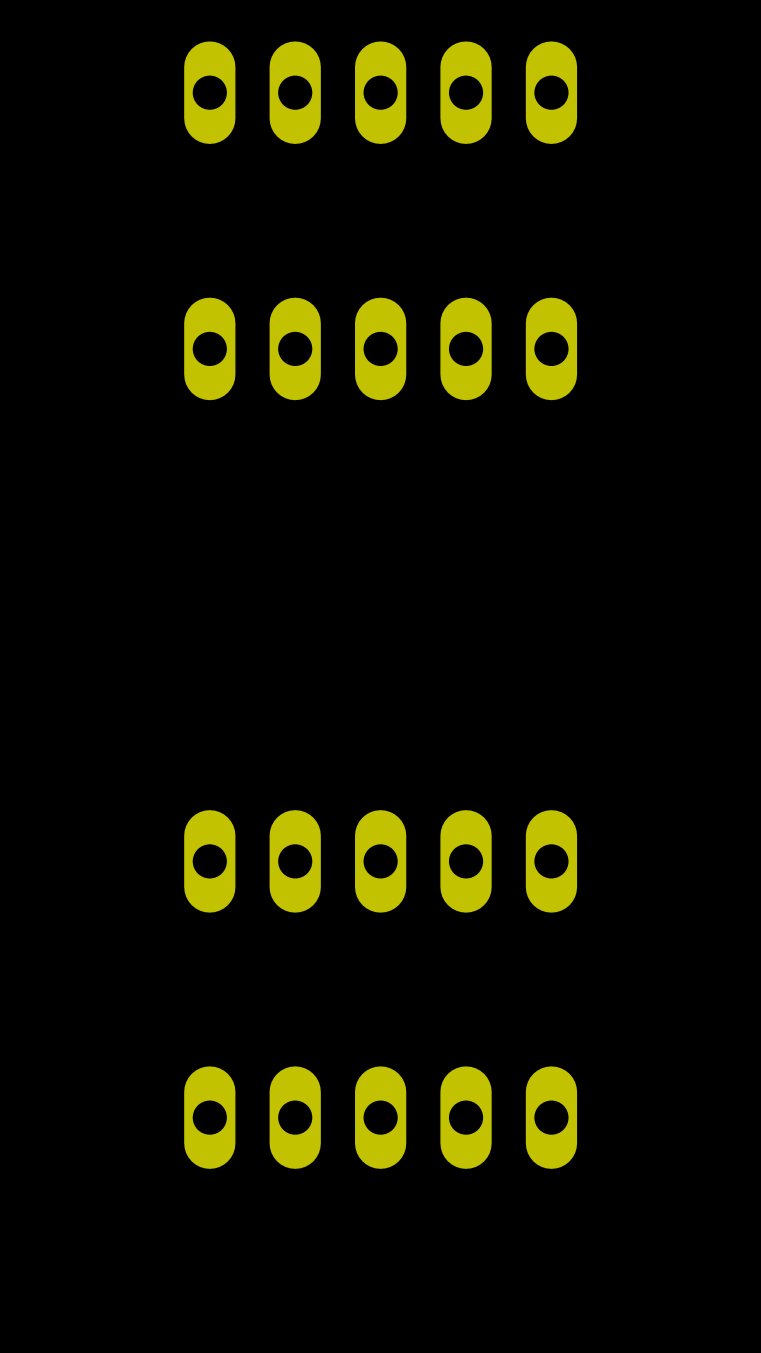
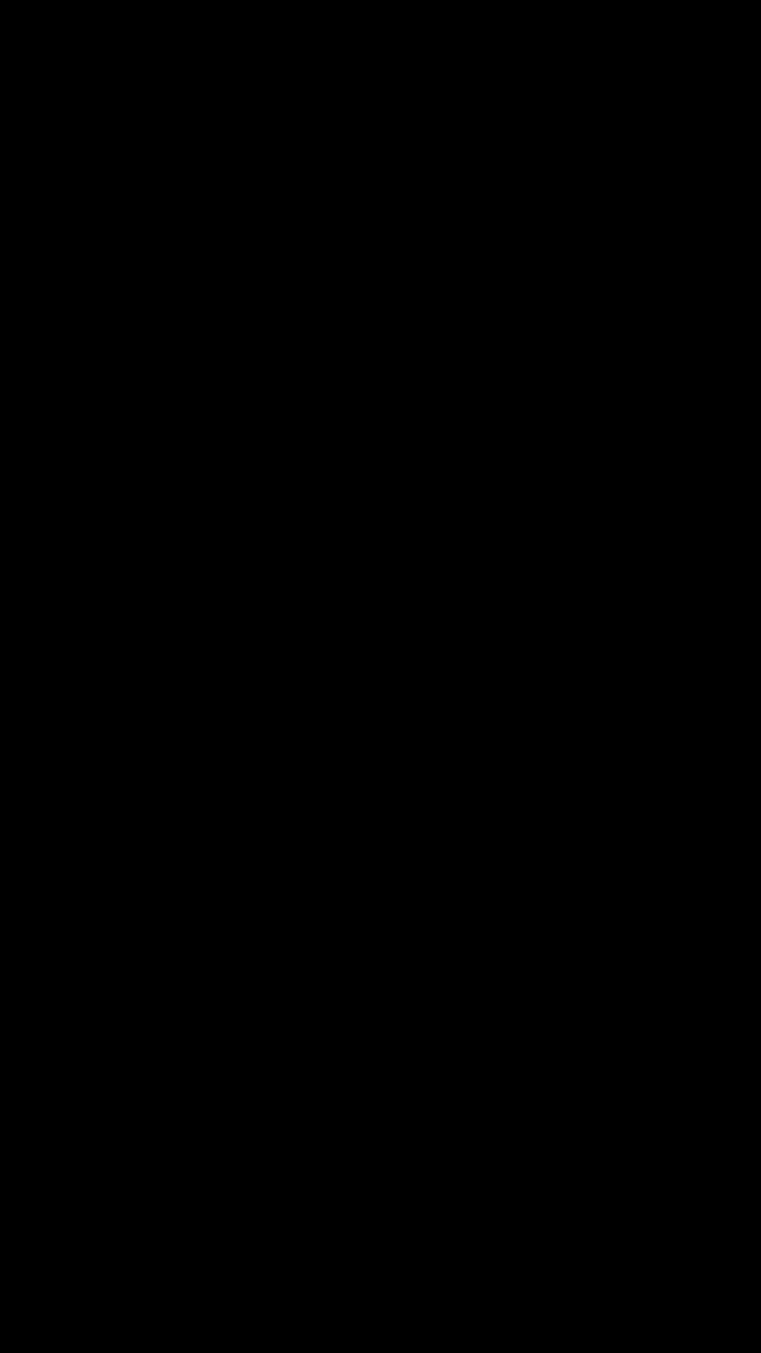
part: (380, 92) -> none
part: (380, 348) -> none
part: (380, 861) -> none
part: (380, 1117) -> none

